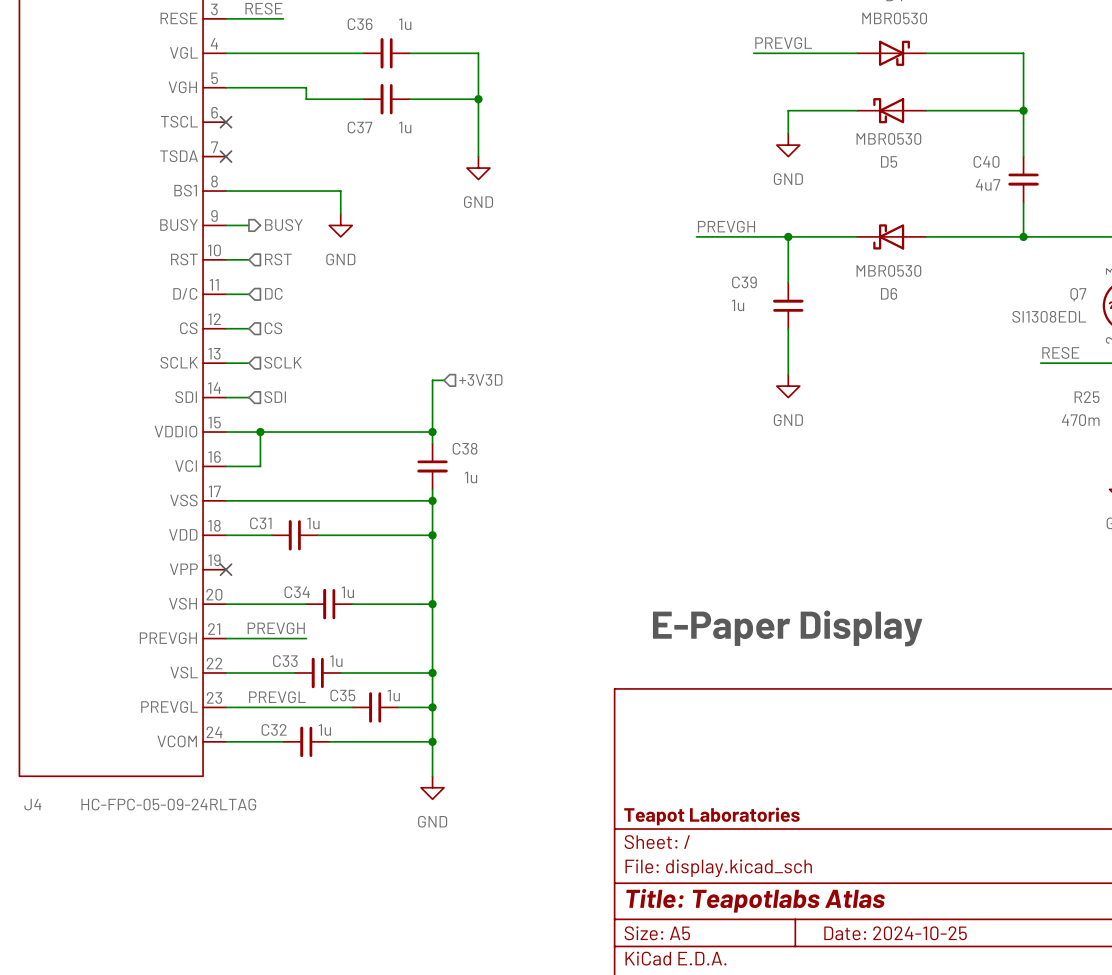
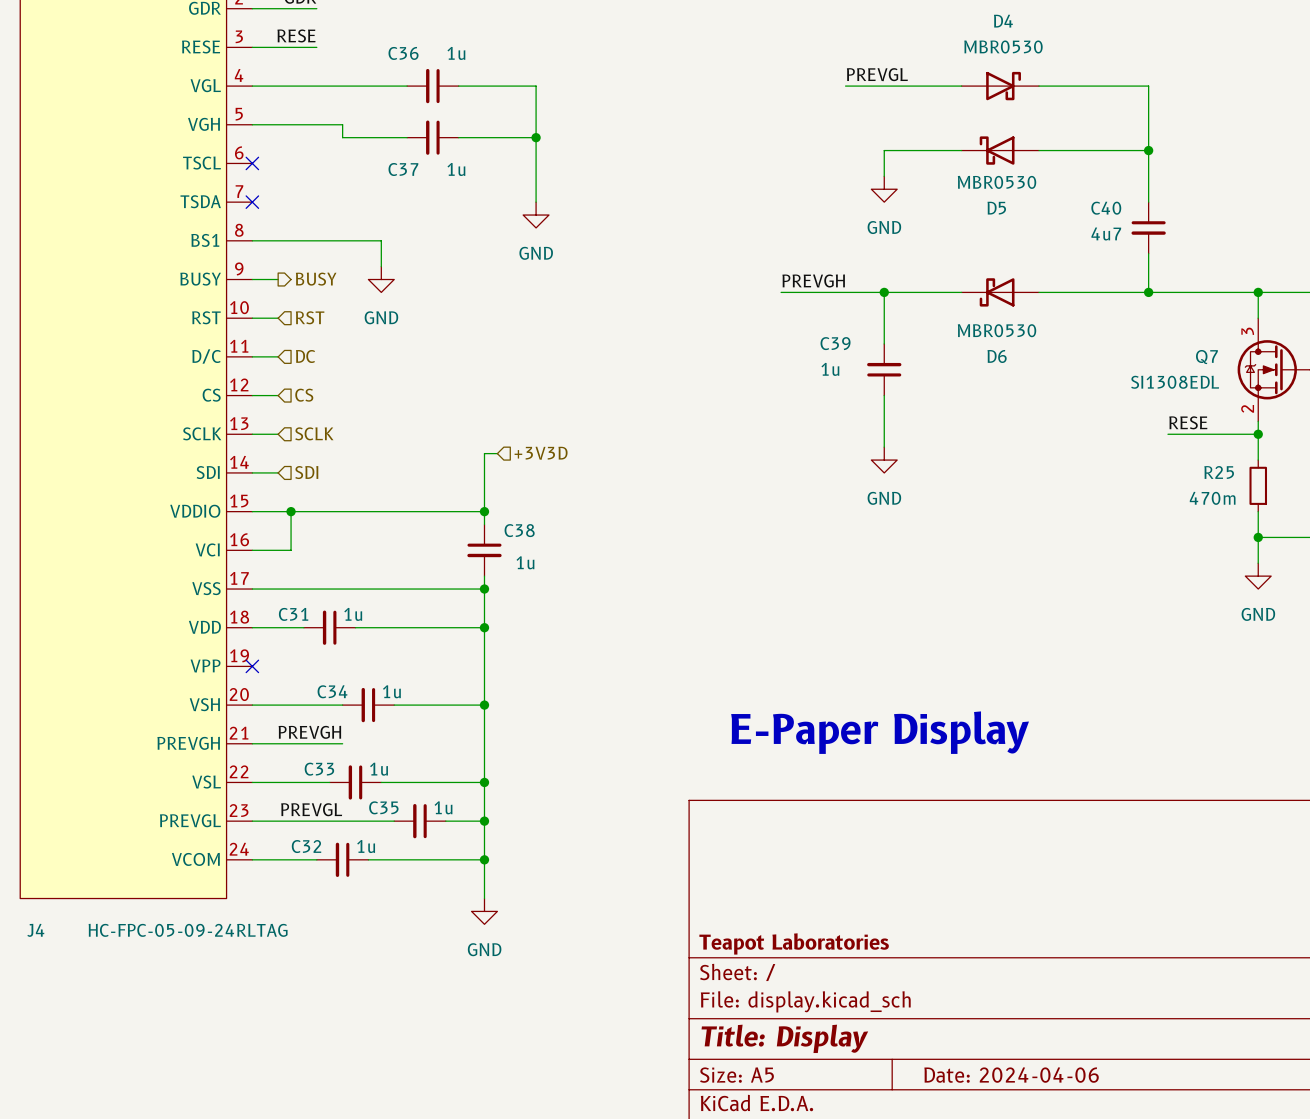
title block: Title: Teapotlabs Atlas (755, 900) -> Title: Display (784, 1038)
title block: Date: 2024-10-25 (895, 933) -> Date: 2024-04-06 (1011, 1075)

